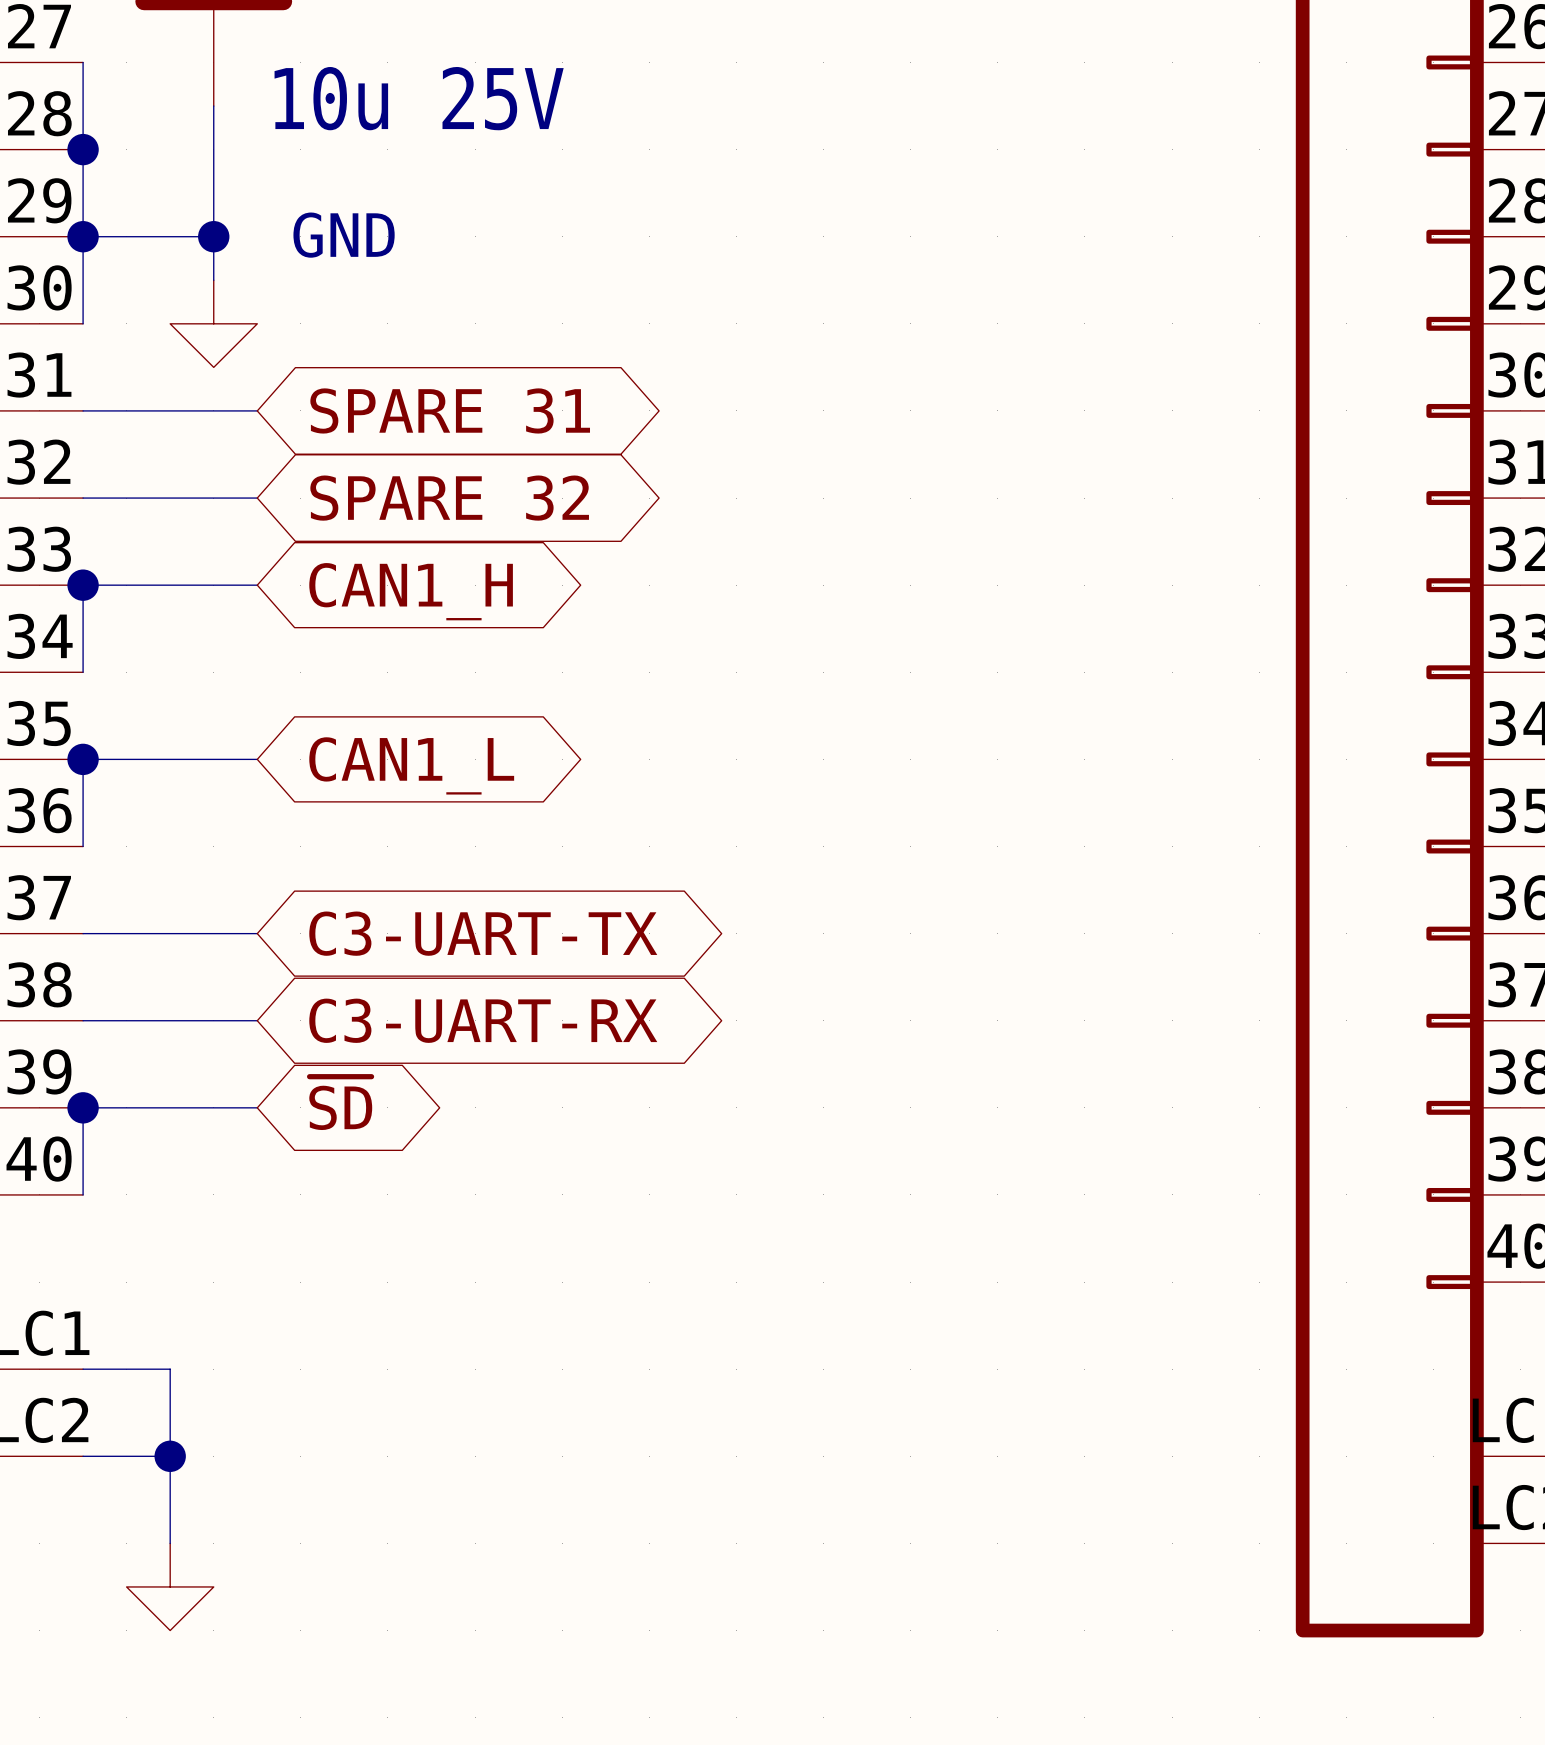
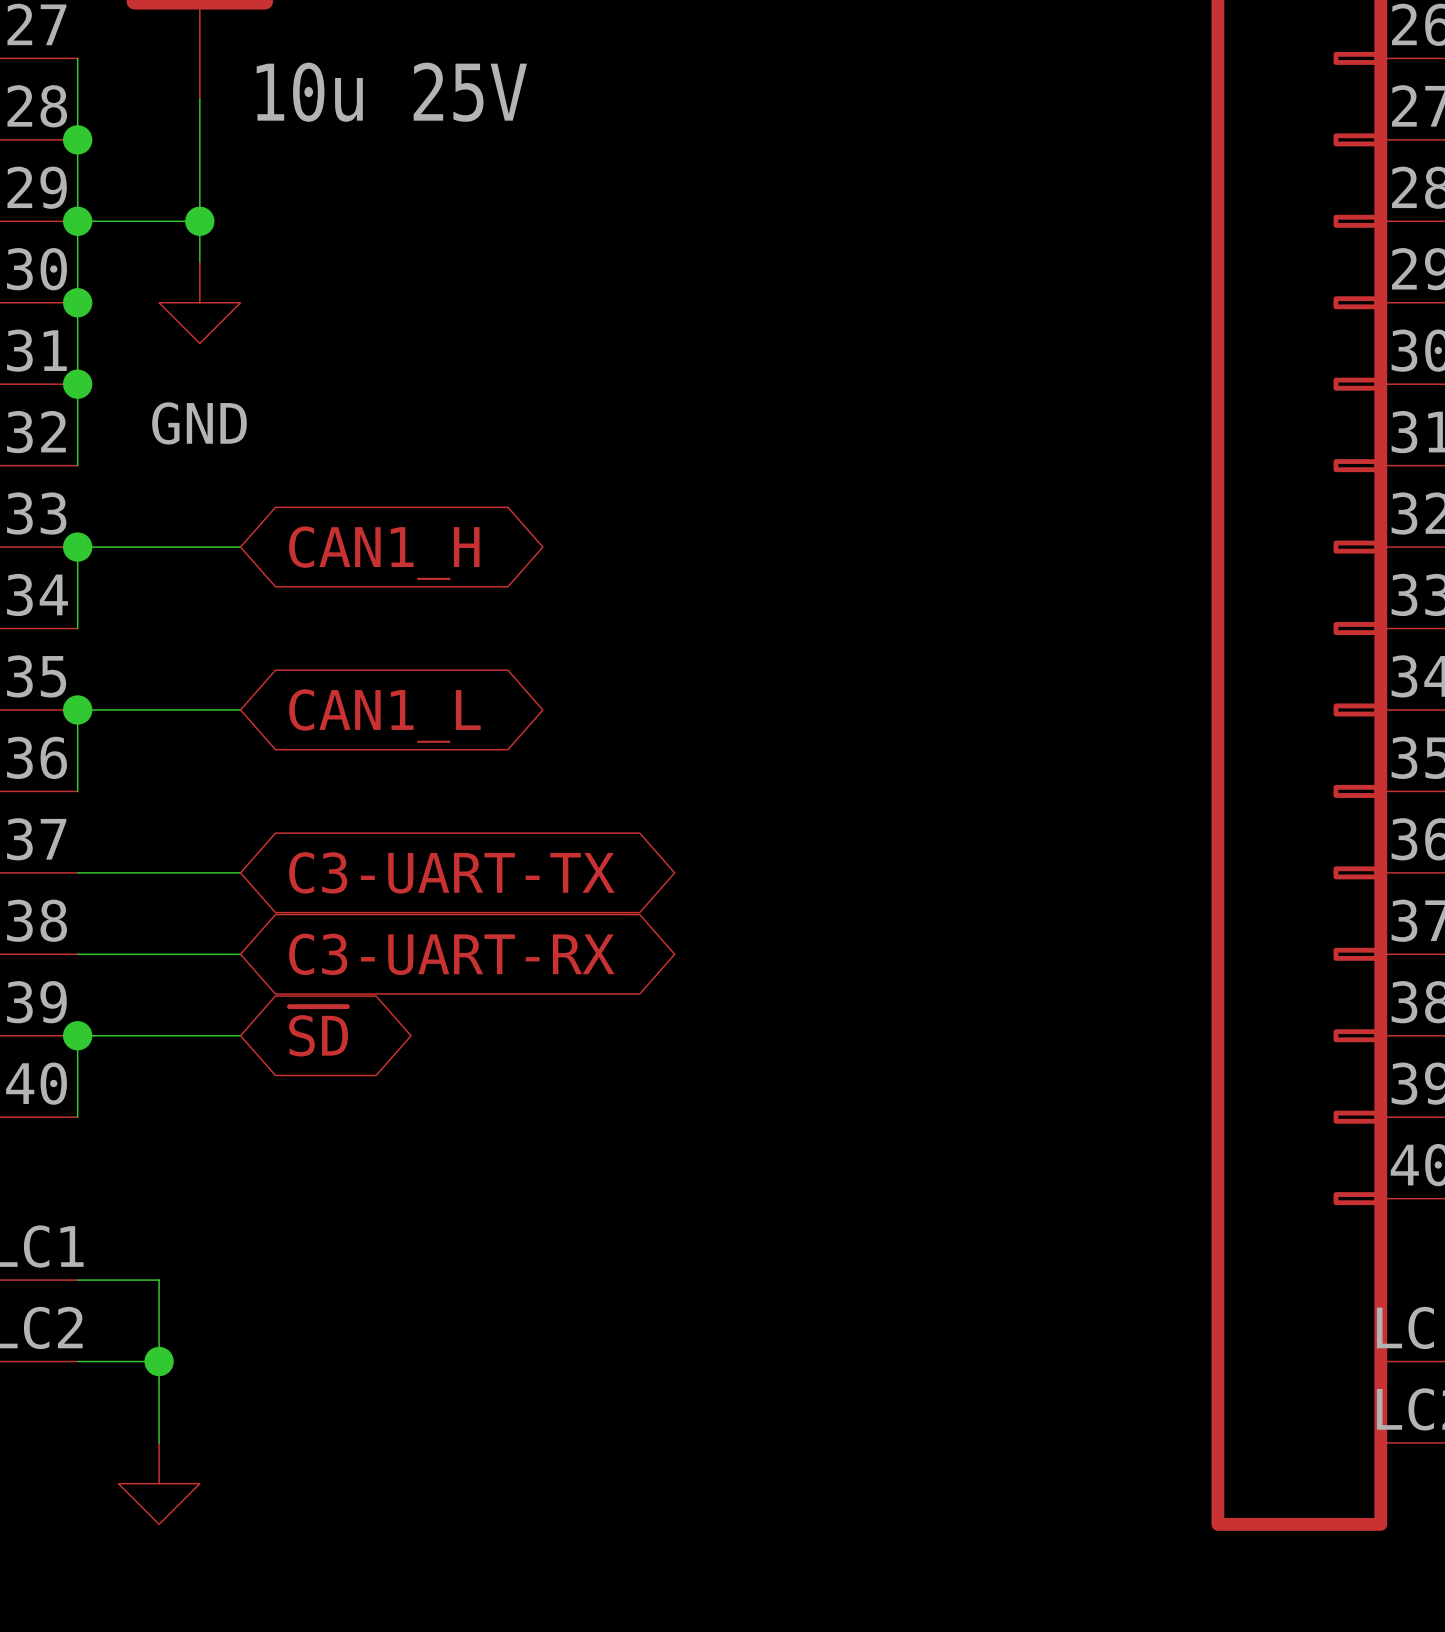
power symbol text position: GND (344, 235) -> GND (199, 423)
junction: none -> (77, 302)
wire: (83, 410) (257, 410) -> none
junction: none -> (77, 384)
global label: SPARE 31 (450, 410) -> none
wire: (83, 498) (257, 498) -> (77, 465) (77, 302)
global label: SPARE 32 (449, 498) -> none

